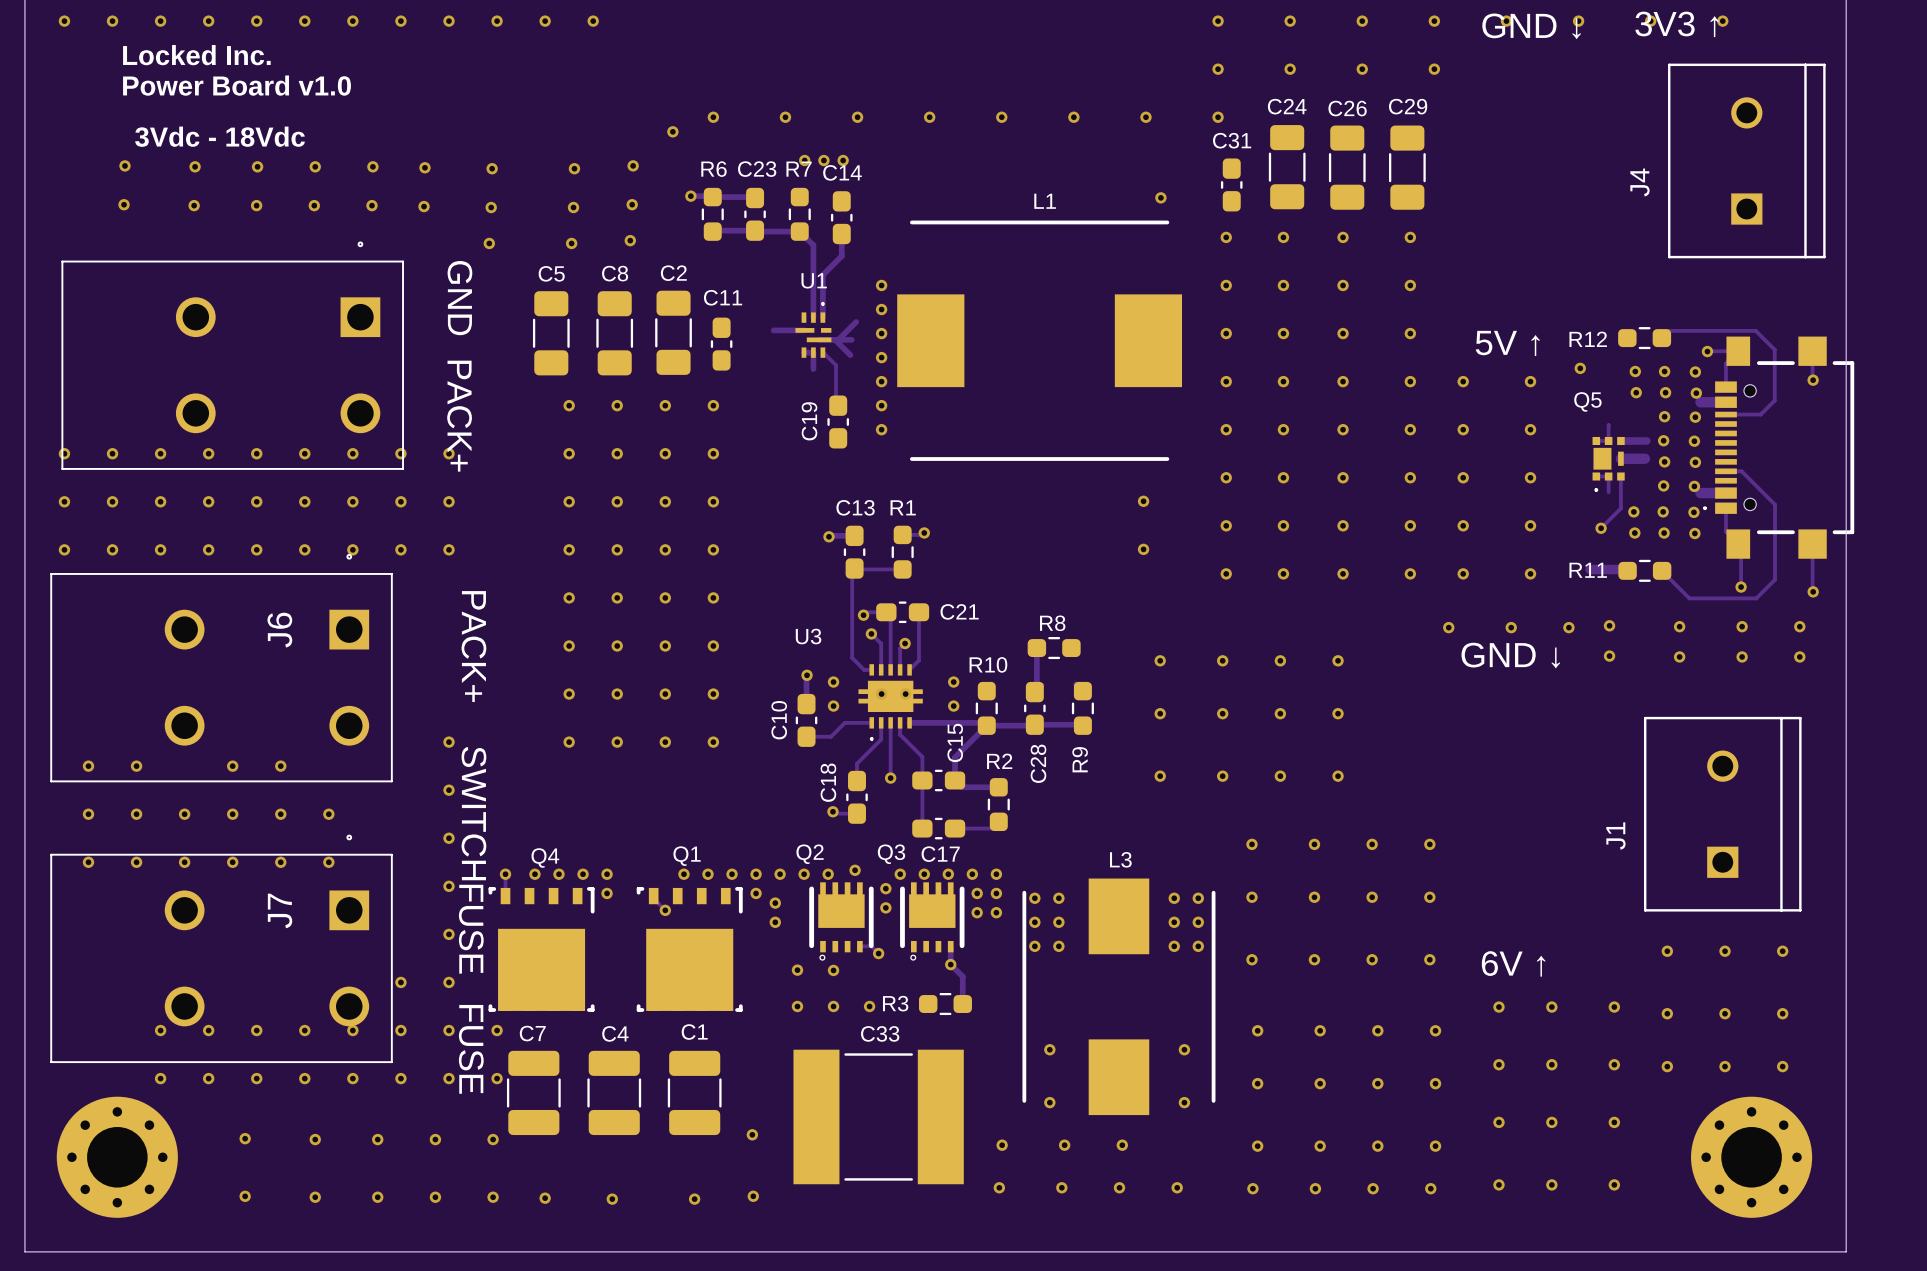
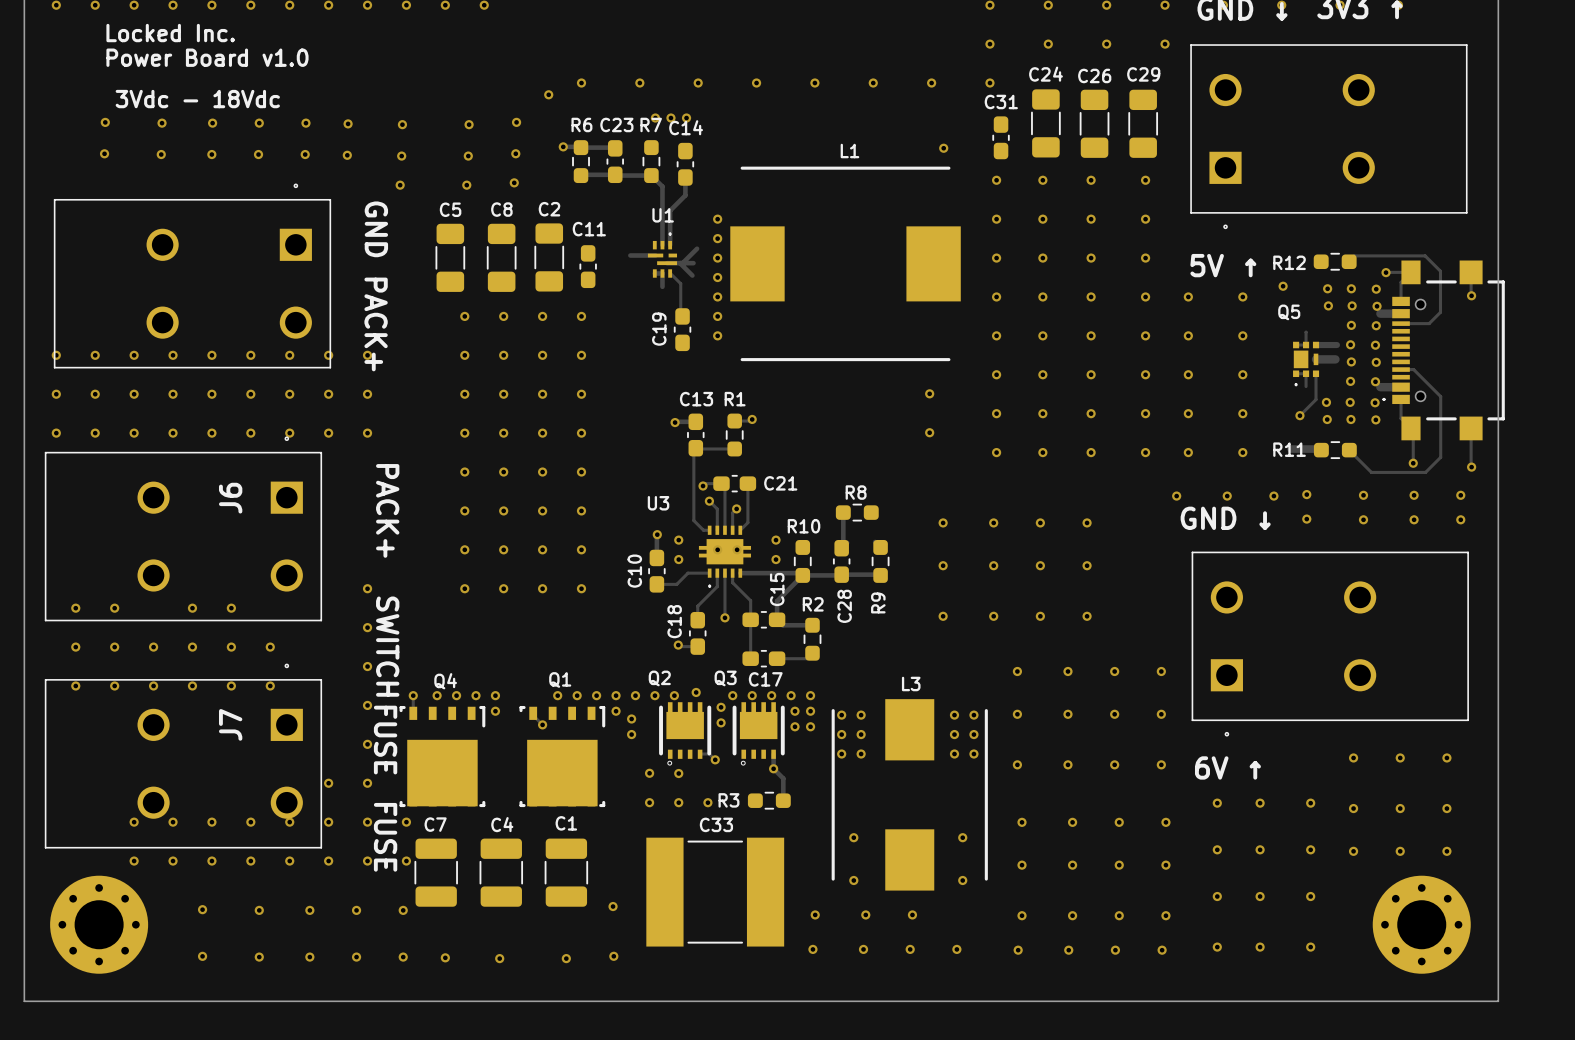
J4: (1746, 160) -> none
part: none -> (1328, 136)
part: none -> (1330, 644)
J1: (1722, 814) -> none

